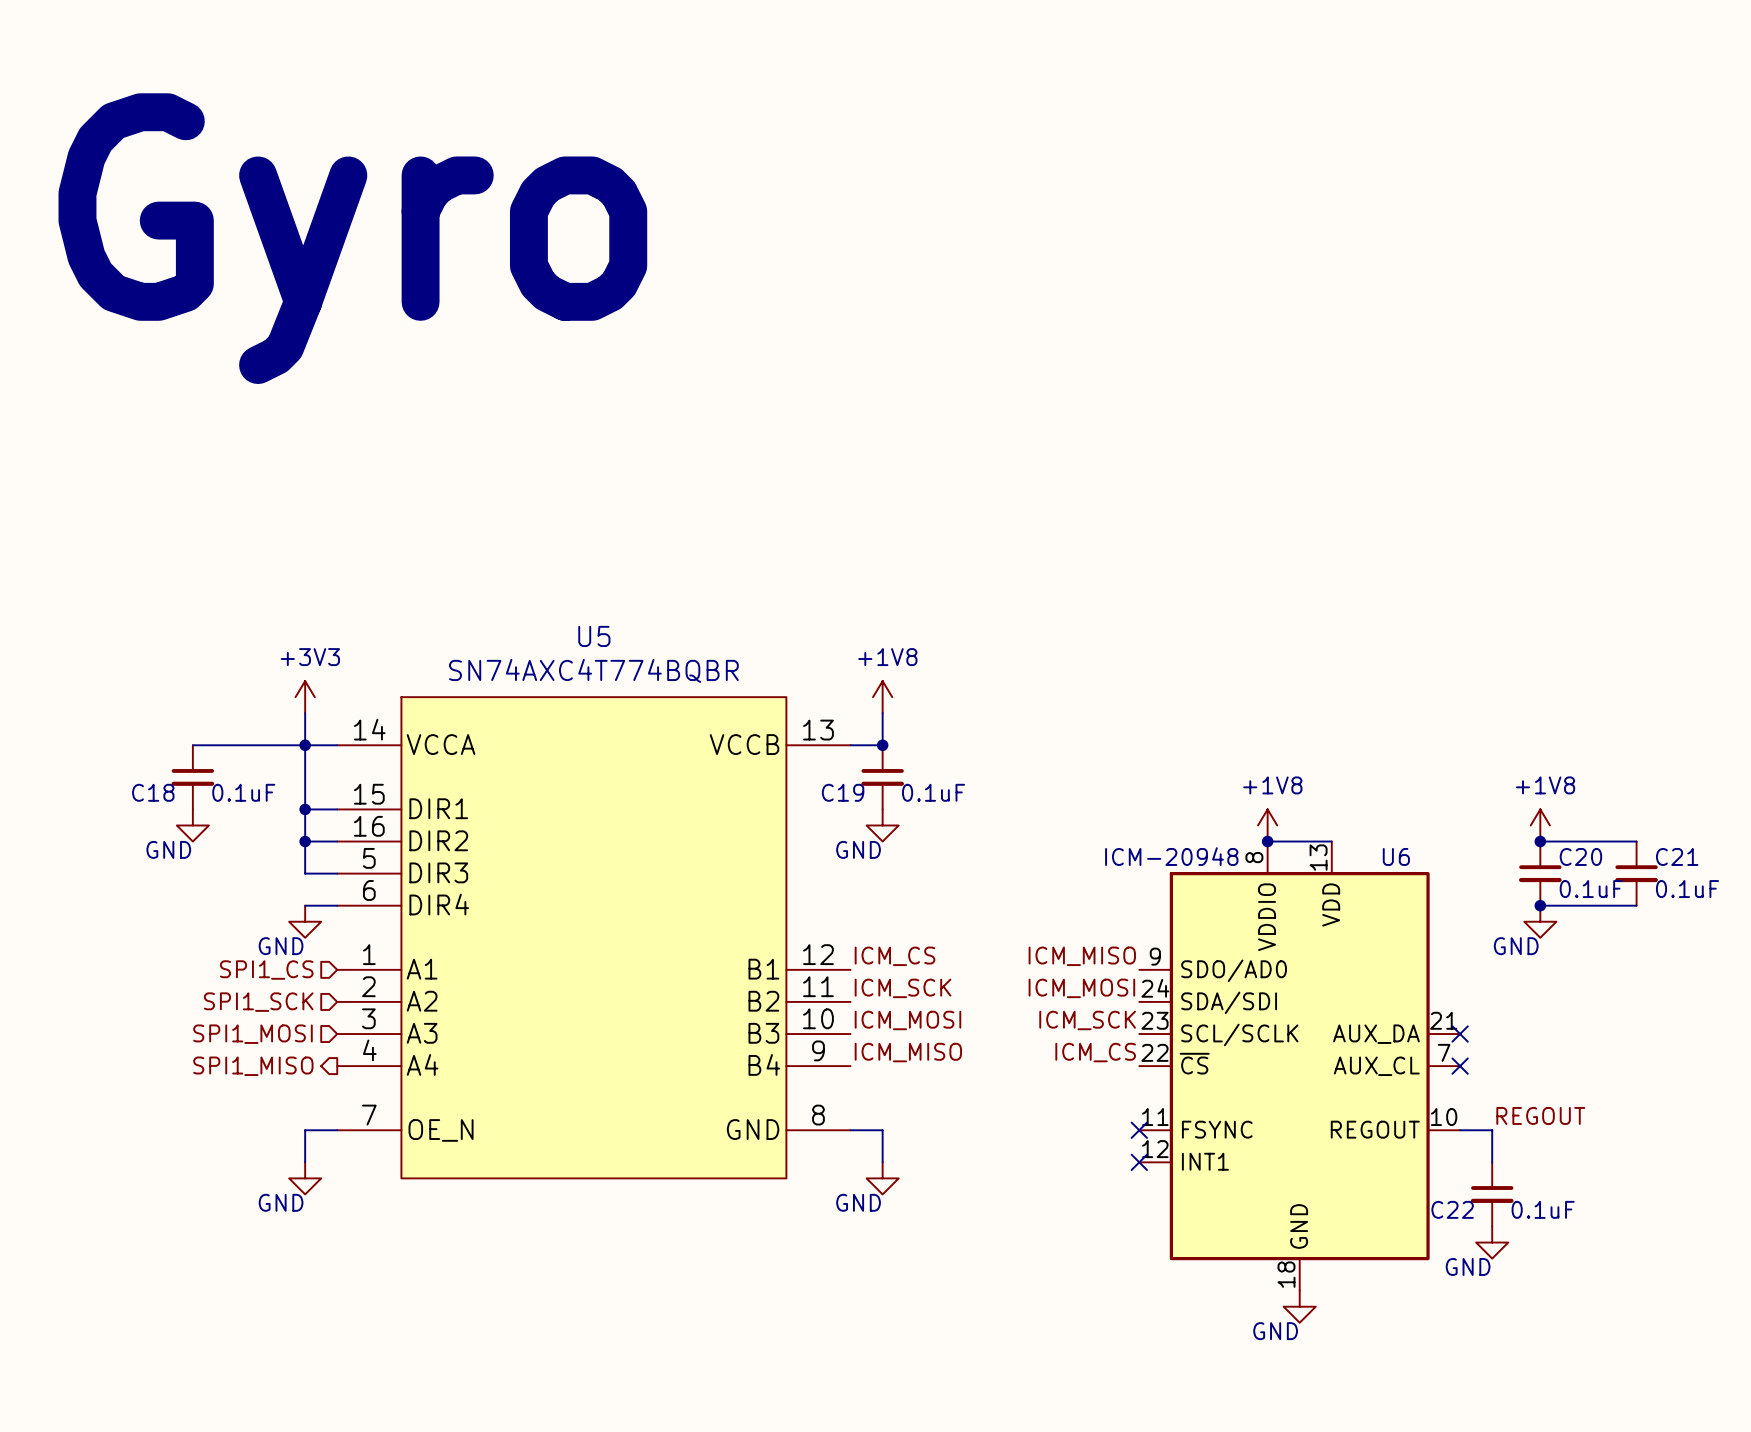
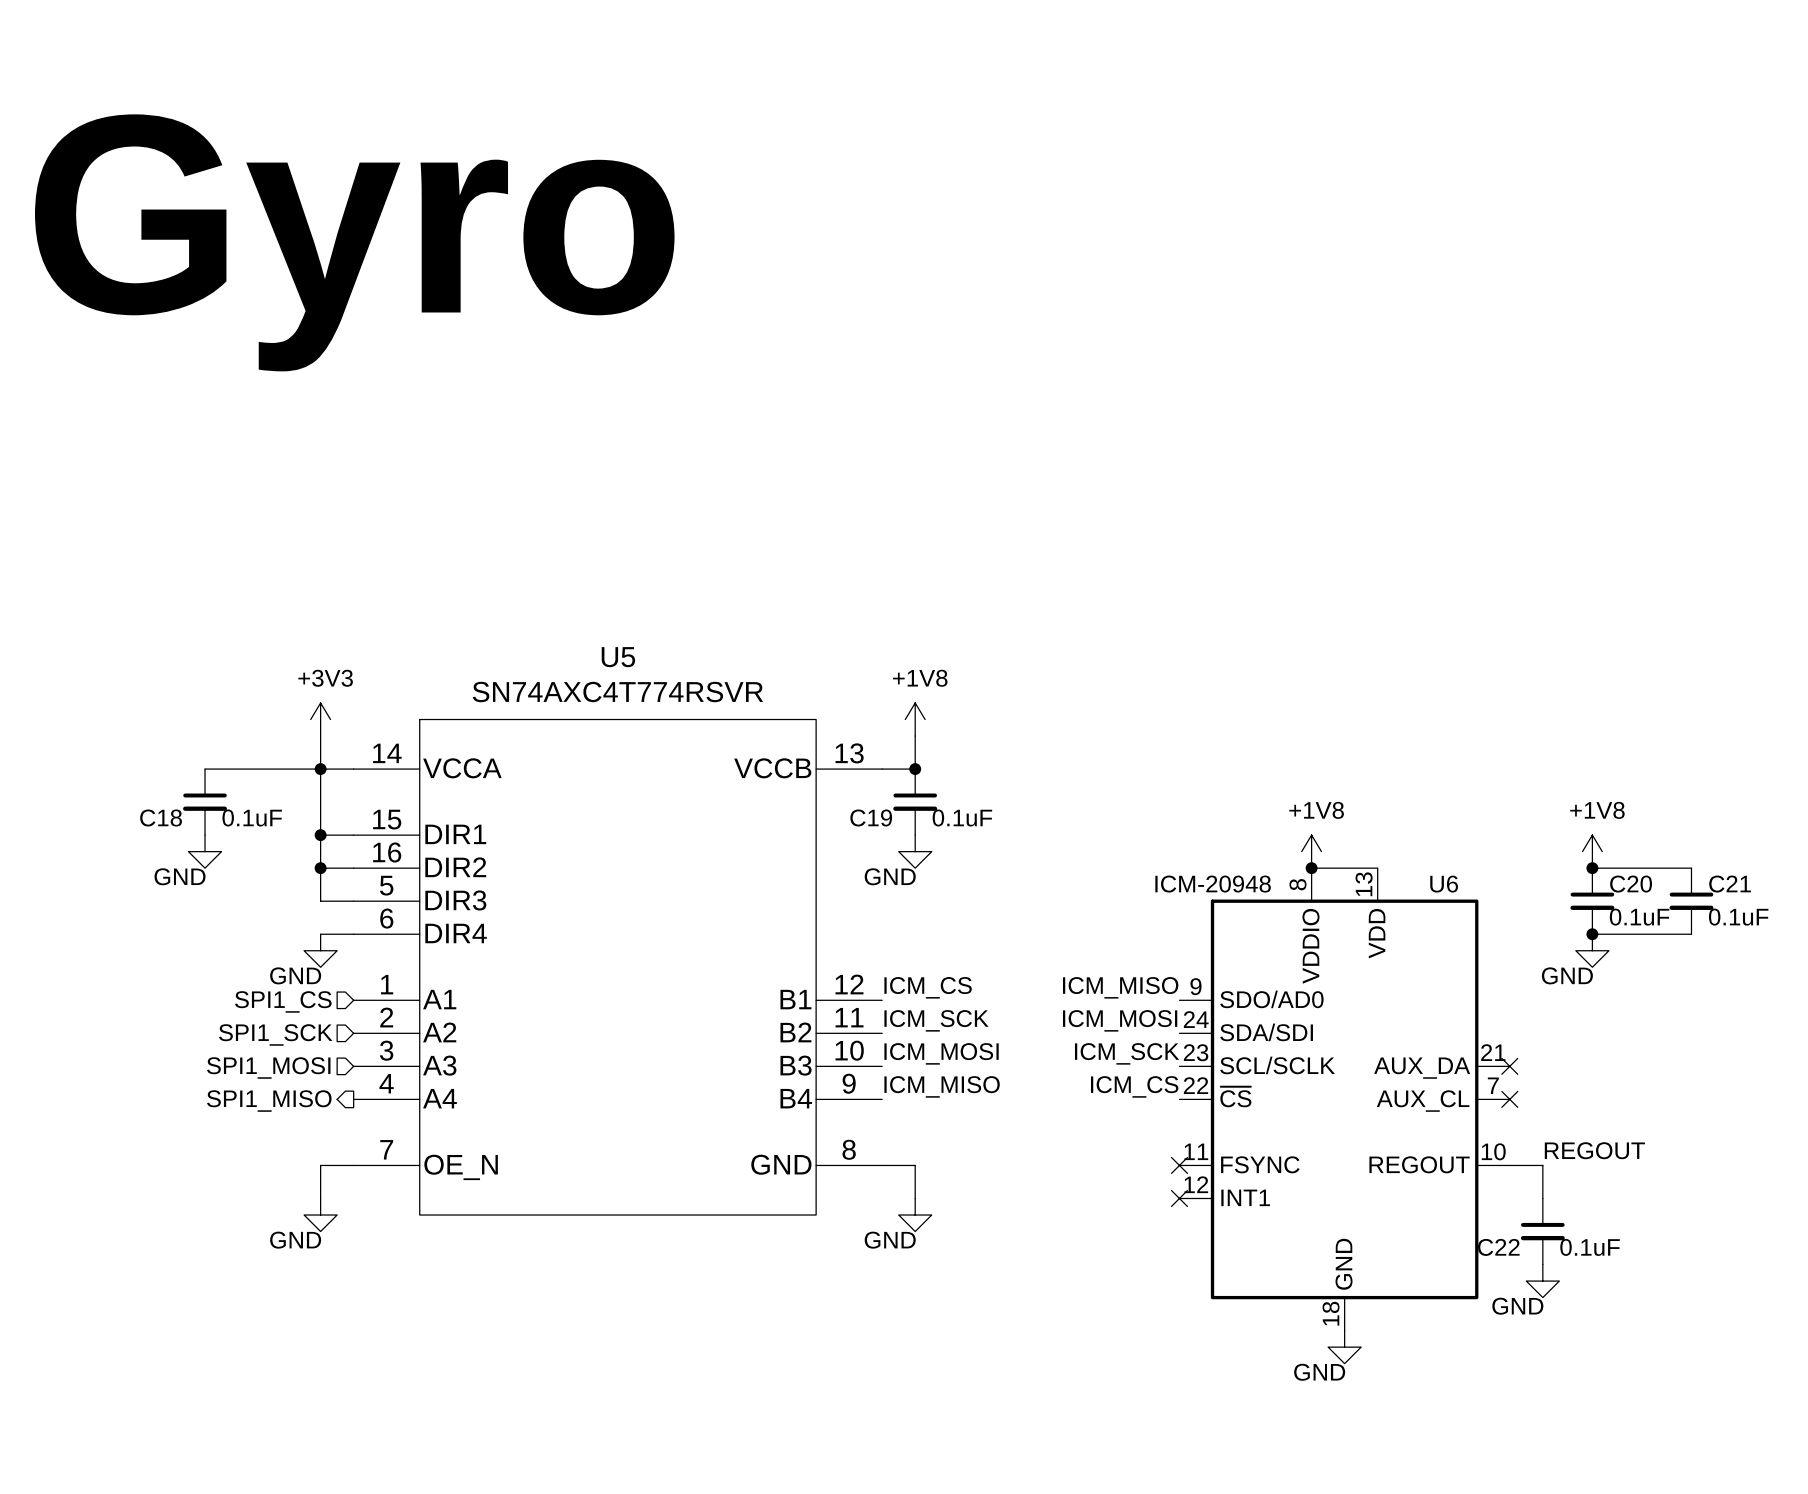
U5 value: SN74AXC4T774BQBR (593, 670) -> SN74AXC4T774RSVR (617, 692)

